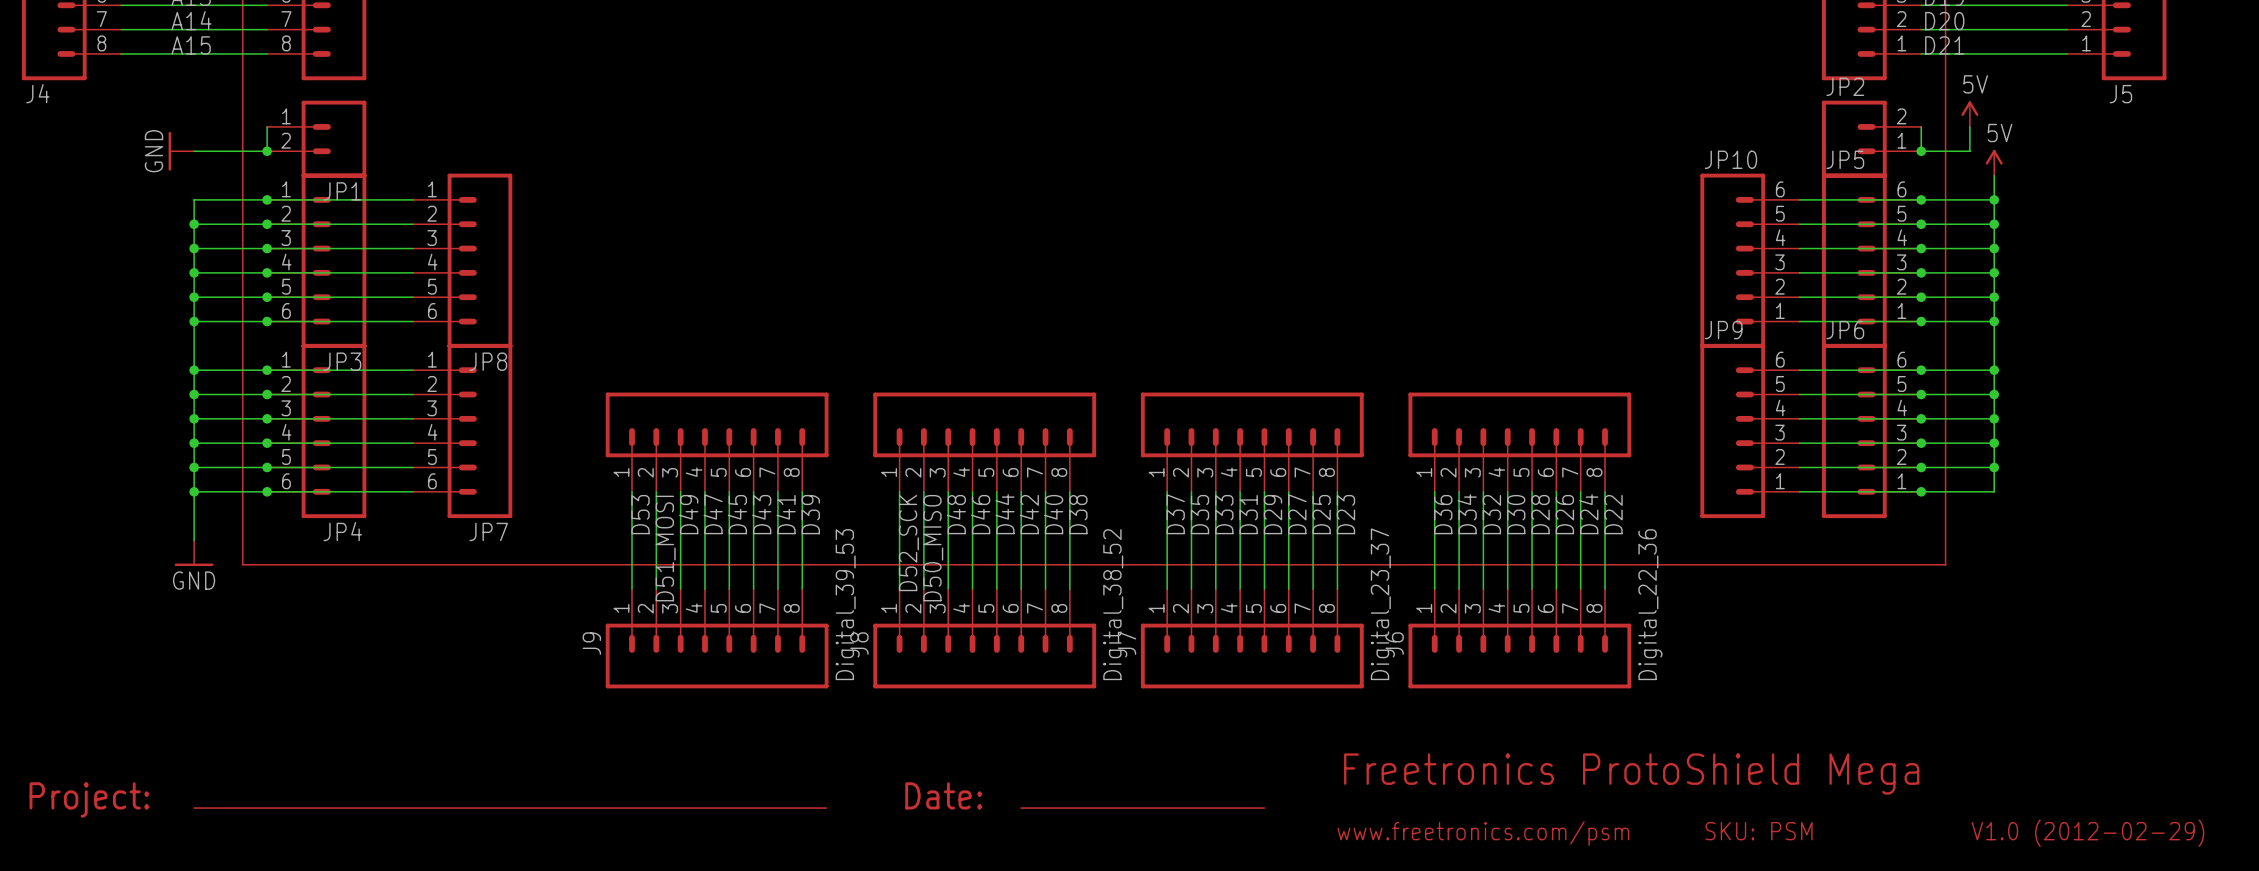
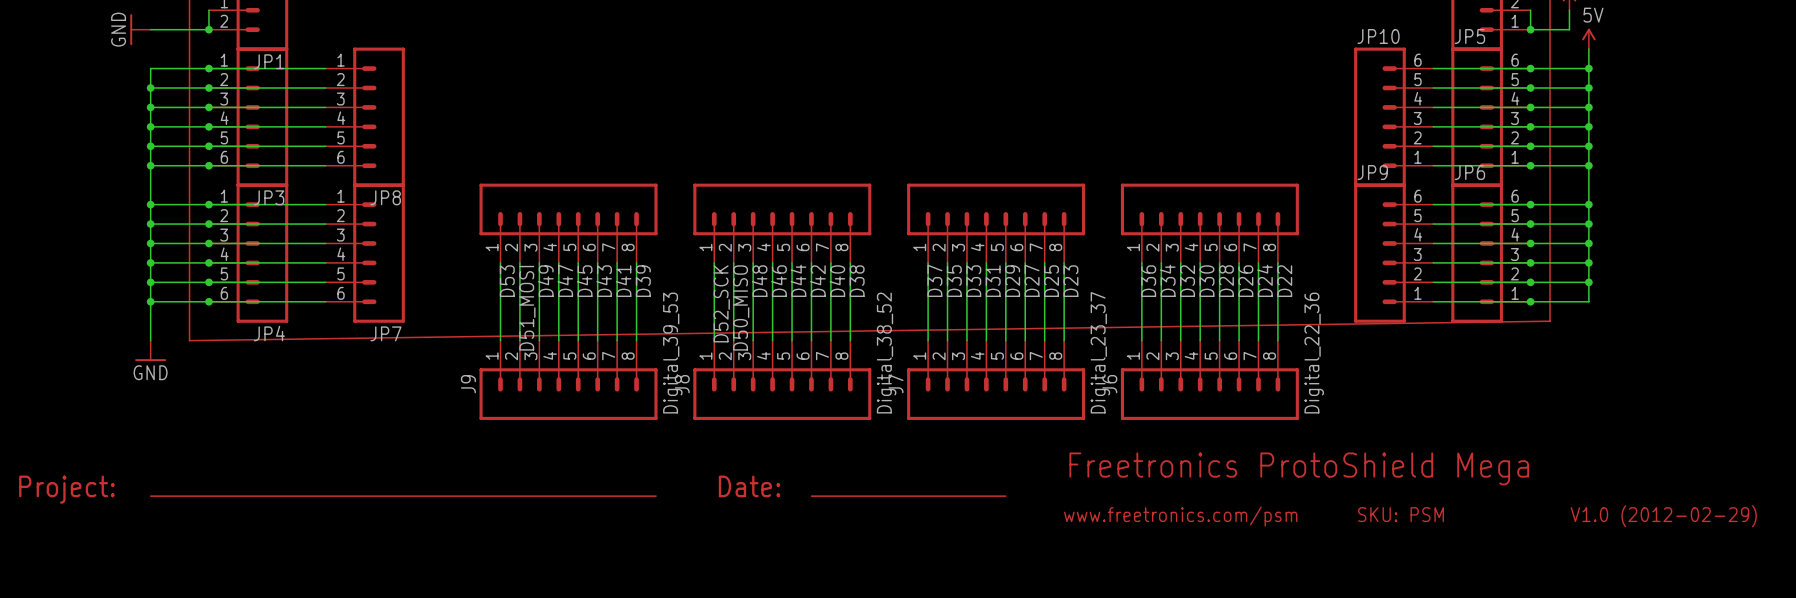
part position: (717, 442) -> (568, 223)
part position: (984, 442) -> (782, 223)
part position: (1252, 442) -> (996, 223)
part position: (1519, 442) -> (1209, 223)
label position: D53 (640, 514) -> D53 (507, 281)
label position: D49 (688, 514) -> D49 (545, 281)
label position: D47 (713, 514) -> D47 (565, 280)
label position: D45 (737, 514) -> D45 (584, 281)
label position: D43 (761, 514) -> D43 (604, 281)
label position: D41 (786, 514) -> D41 (623, 281)
label position: D39 (810, 514) -> D39 (643, 281)
label position: D48 (956, 514) -> D48 (759, 281)
label position: D46 (980, 514) -> D46 (779, 281)
label position: D44 (1004, 514) -> D44 (798, 280)
label position: D42 (1029, 514) -> D42 (817, 281)
label position: D40 (1053, 514) -> D40 (837, 281)
label position: D38 (1078, 514) -> D38 (857, 281)
label position: D37 (1175, 514) -> D37 (934, 280)
label position: D35 (1199, 514) -> D35 (954, 281)
label position: D33 (1224, 514) -> D33 (973, 281)
label position: D31 (1248, 514) -> D31 (993, 281)
label position: D29 (1272, 514) -> D29 (1012, 281)
label position: D27 (1297, 514) -> D27 (1032, 280)
label position: D25 (1321, 514) -> D25 (1051, 281)
label position: D23 (1345, 514) -> D23 (1070, 281)
label position: D36 (1443, 514) -> D36 (1148, 281)
label position: D34 (1467, 514) -> D34 (1167, 280)
label position: D32 (1491, 514) -> D32 (1187, 281)
label position: D30 (1516, 514) -> D30 (1206, 281)
label position: D28 (1540, 514) -> D28 (1226, 281)
label position: D26 (1564, 514) -> D26 (1245, 281)
label position: D24 (1588, 514) -> D24 (1264, 280)
label position: D22 (1613, 514) -> D22 (1284, 281)
line: (1945, 516) (1945, 564) (242, 564) (242, 540) -> (1550, 321) (189, 340)
label position: D52_SCK (908, 543) -> D52_SCK (721, 303)
label position: D51_MOSI (665, 548) -> D51_MOSI (527, 308)
label position: D50_MISO (933, 548) -> D50_MISO (741, 307)
J9 position: (717, 638) -> (568, 380)
J8 position: (984, 638) -> (782, 380)
J7 position: (1252, 638) -> (996, 380)
J6 position: (1519, 638) -> (1209, 380)
text position: Freetronics ProtoShield Mega (1631, 773) -> Freetronics ProtoShield Mega (1299, 468)
text position: Date: (943, 795) -> Date: (749, 486)
text position: Project: (89, 799) -> Project: (66, 489)
line: (194, 808) (826, 808) -> (150, 496) (655, 496)
line: (1021, 808) (1264, 808) -> (811, 496) (1005, 496)
text position: SKU: PSM (1759, 831) -> SKU: PSM (1400, 514)
text position: www.freetronics.com/psm (1483, 833) -> www.freetronics.com/psm (1180, 516)
text position: V1.0 (2012-02-29) (2087, 833) -> V1.0 (2012-02-29) (1663, 516)

